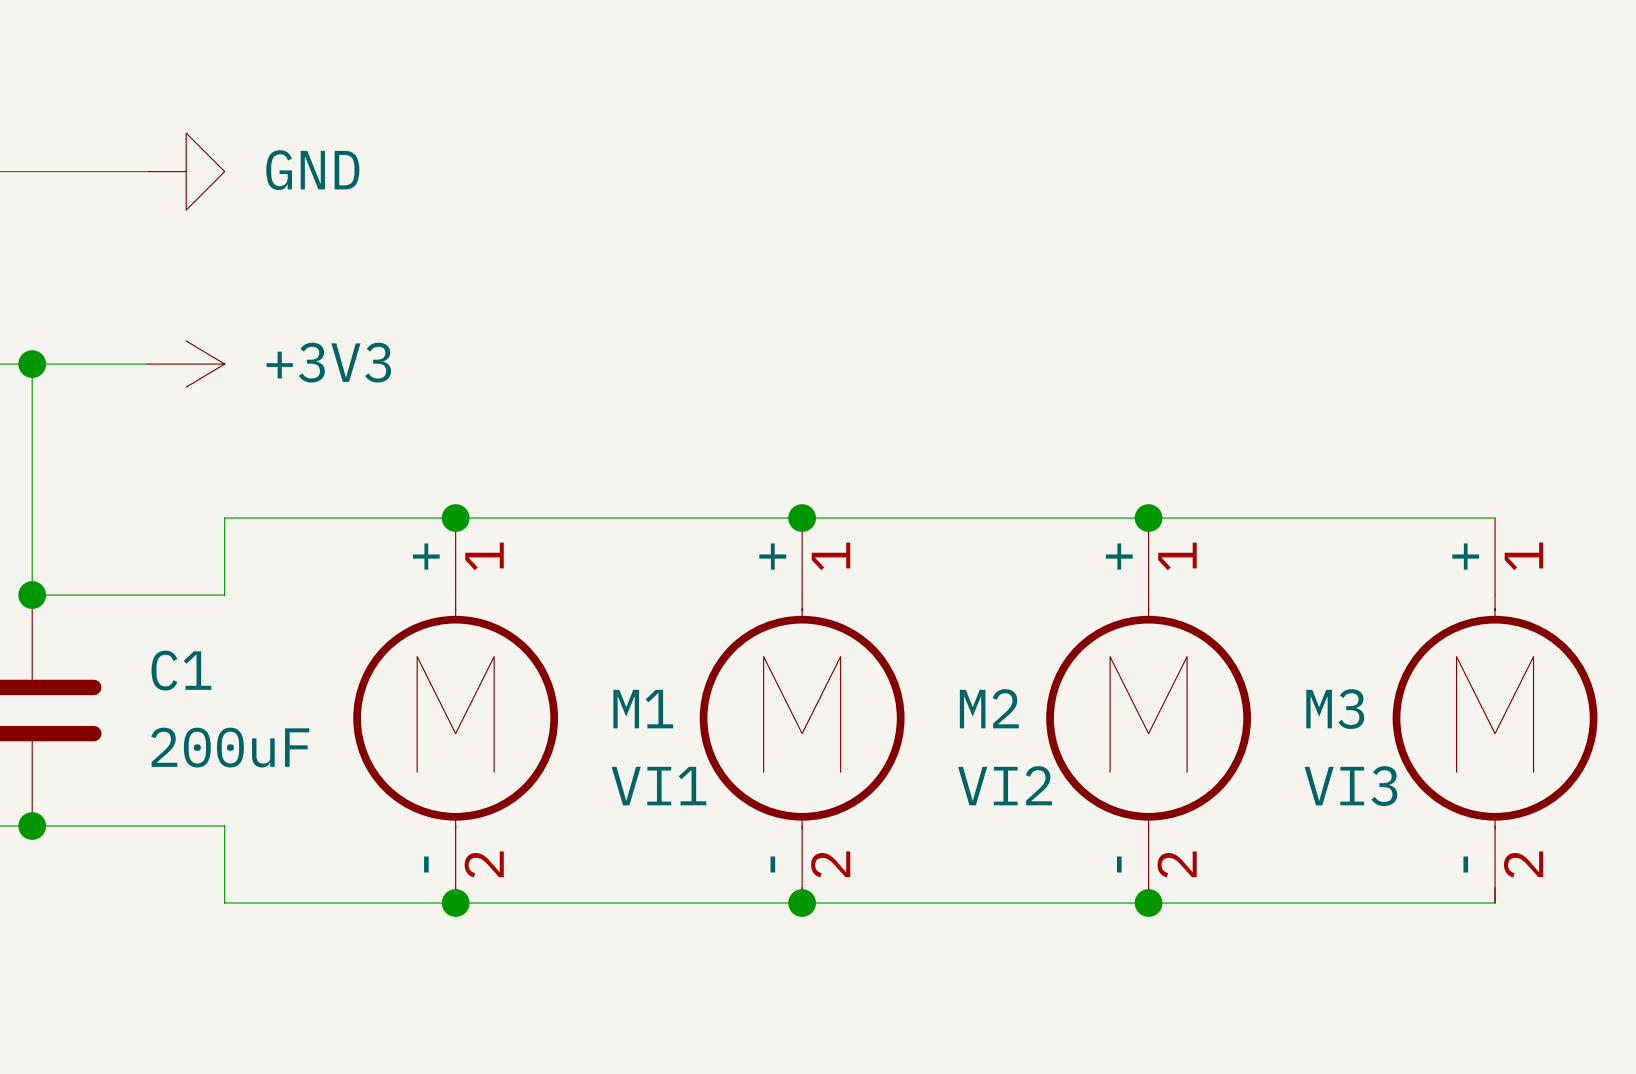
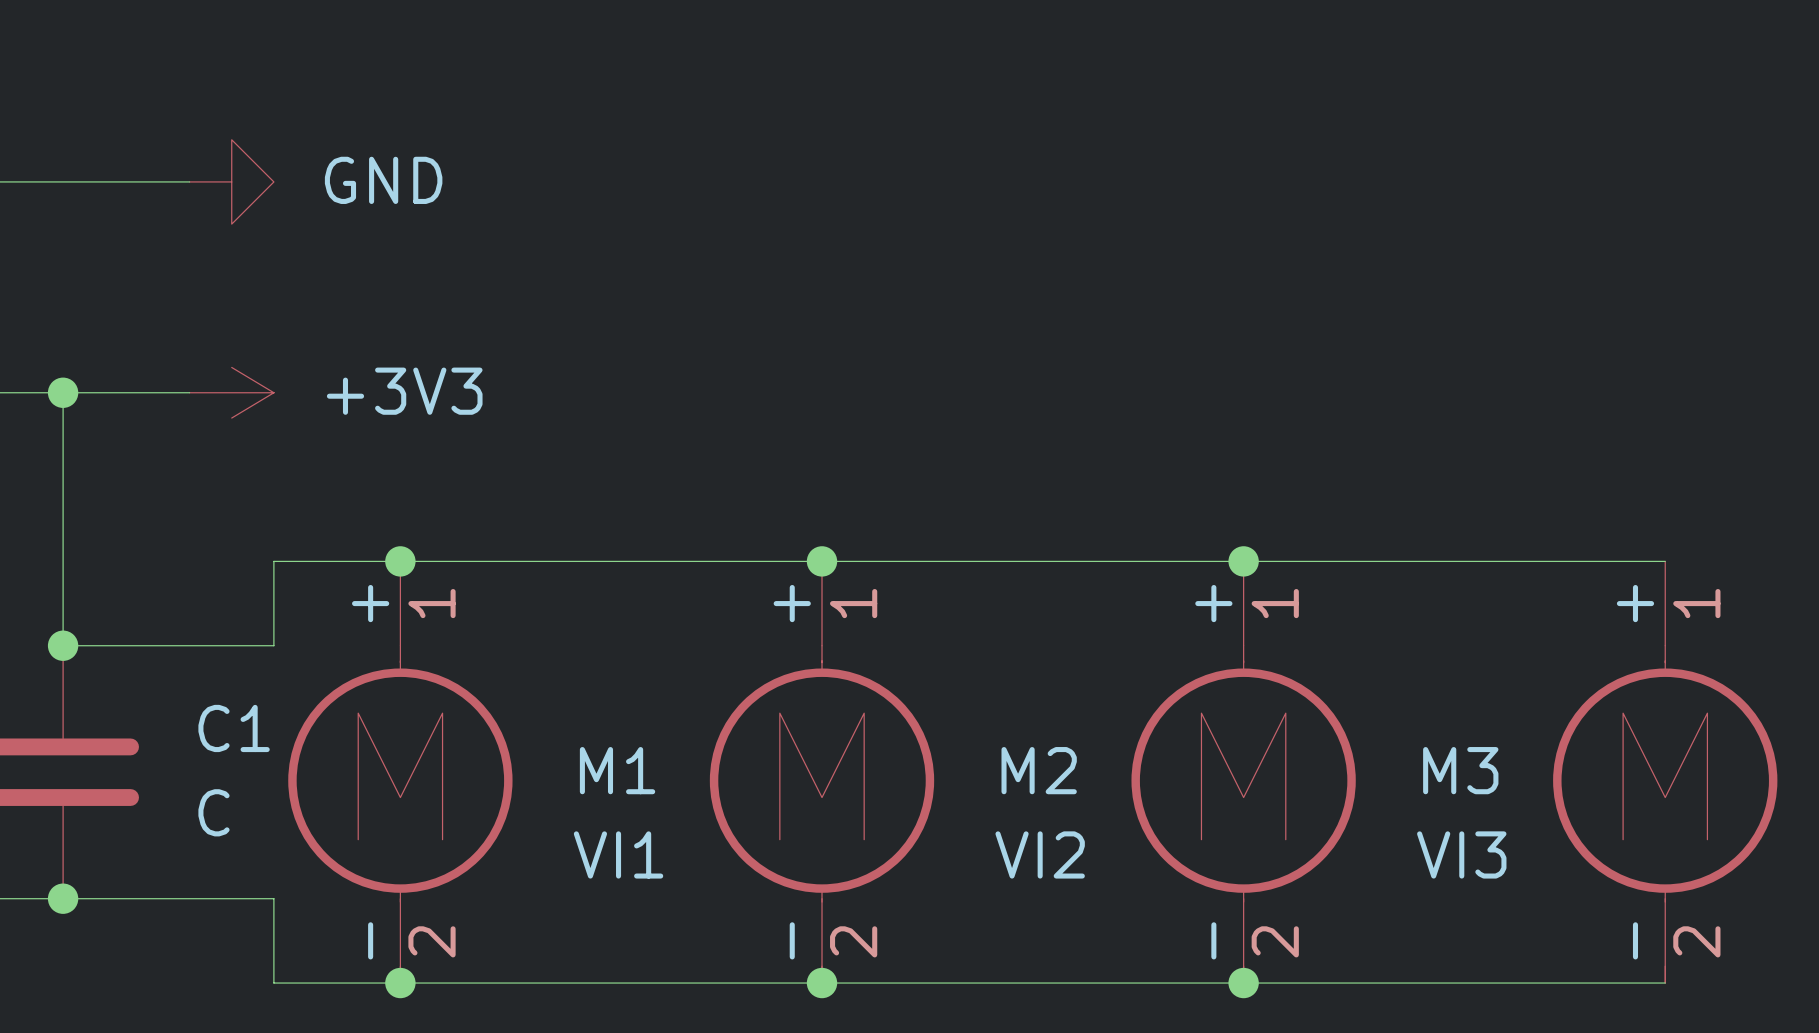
junction position: (455, 518) -> (400, 561)
junction position: (802, 518) -> (822, 561)
junction position: (1148, 518) -> (1243, 561)
M1 position: (455, 710) -> (400, 772)
M2 position: (802, 710) -> (822, 772)
M3 position: (1148, 710) -> (1243, 772)
C1 value: 200uF (230, 747) -> C (213, 812)
junction position: (455, 903) -> (400, 983)
junction position: (802, 903) -> (822, 983)
junction position: (1148, 903) -> (1243, 983)

